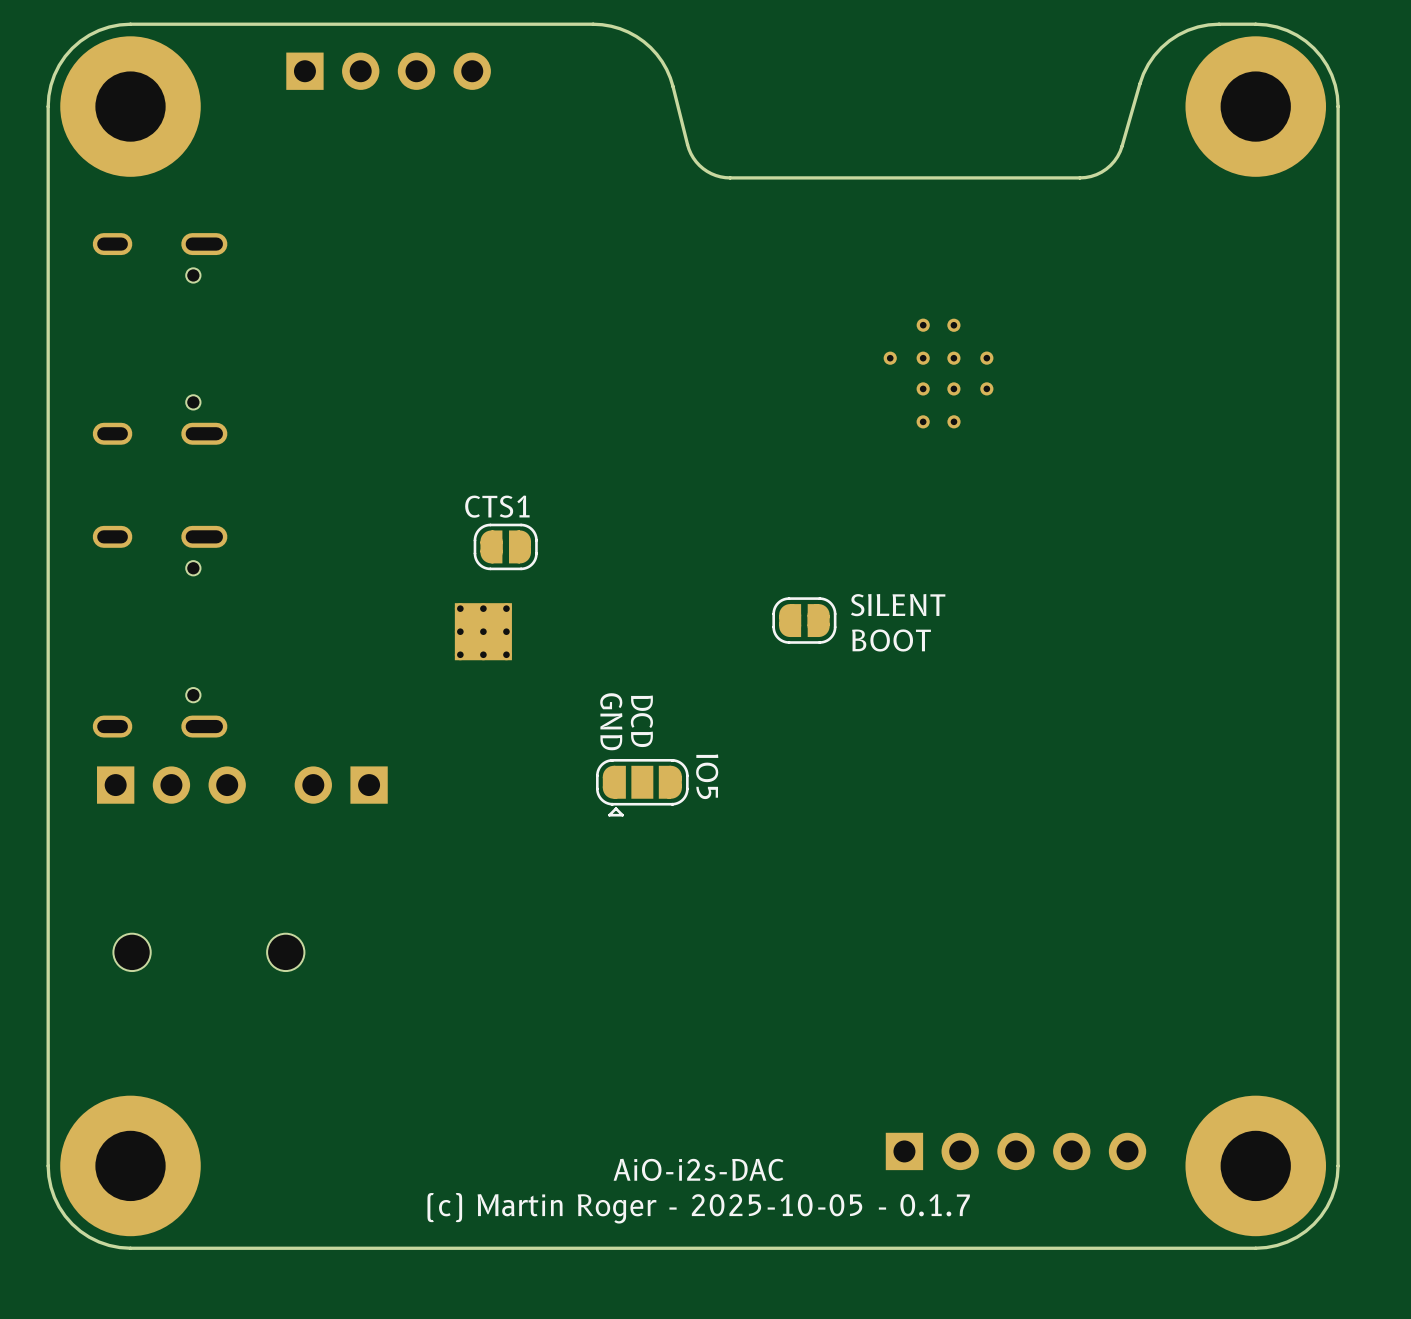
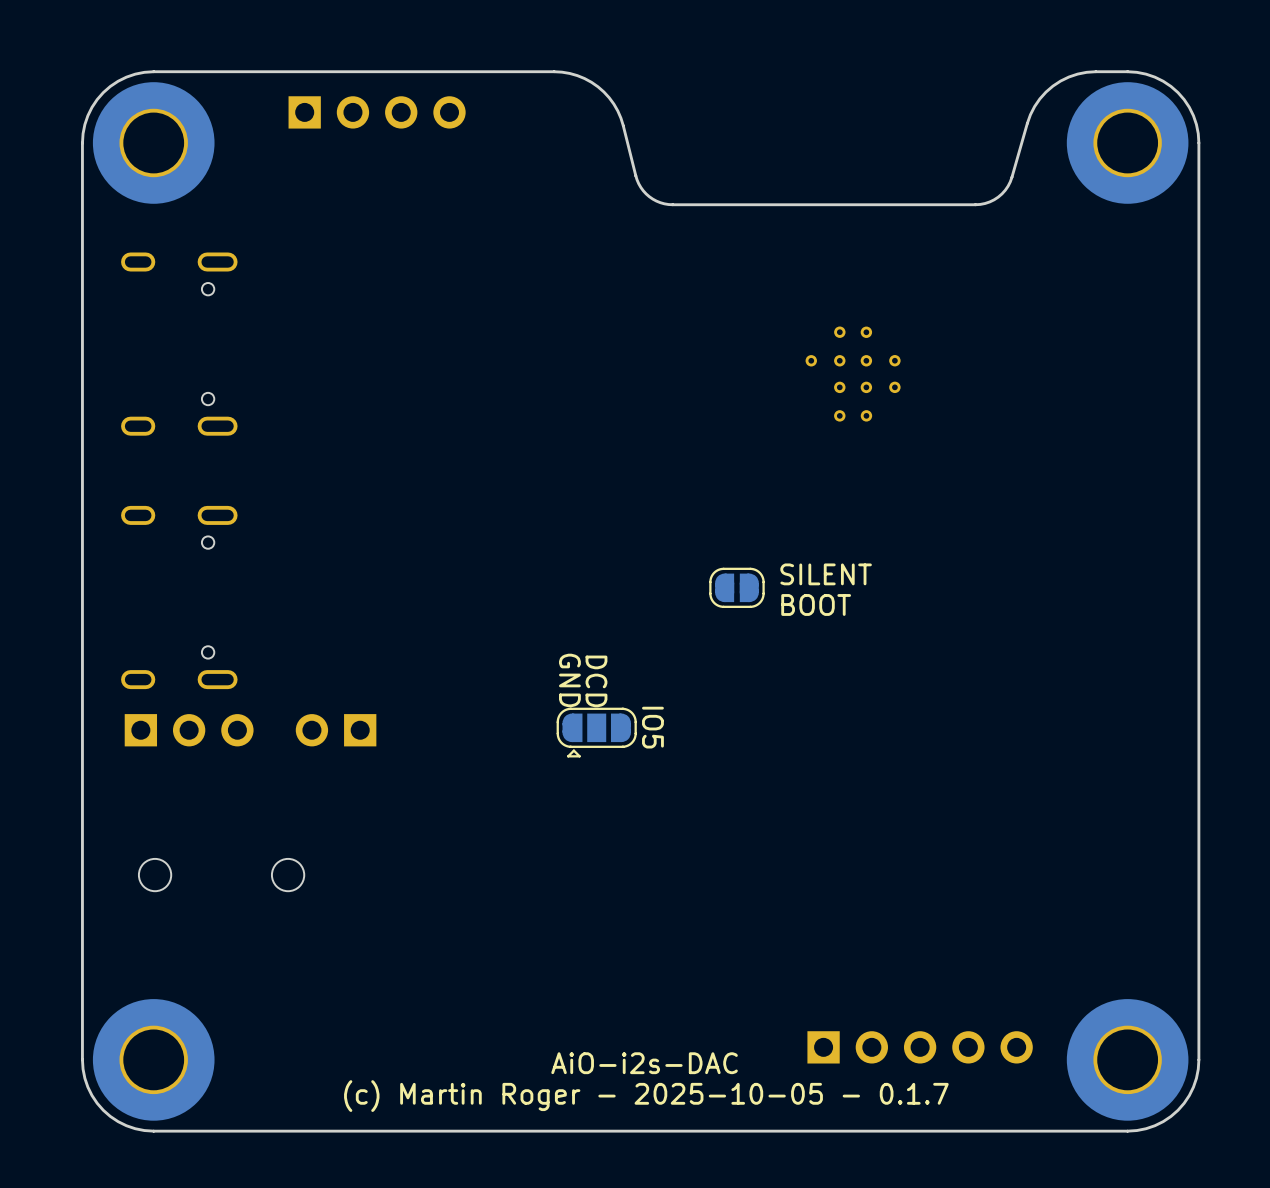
text: CTS1 (497, 506) -> none
part: (505, 546) -> none
part: (483, 631) -> none

